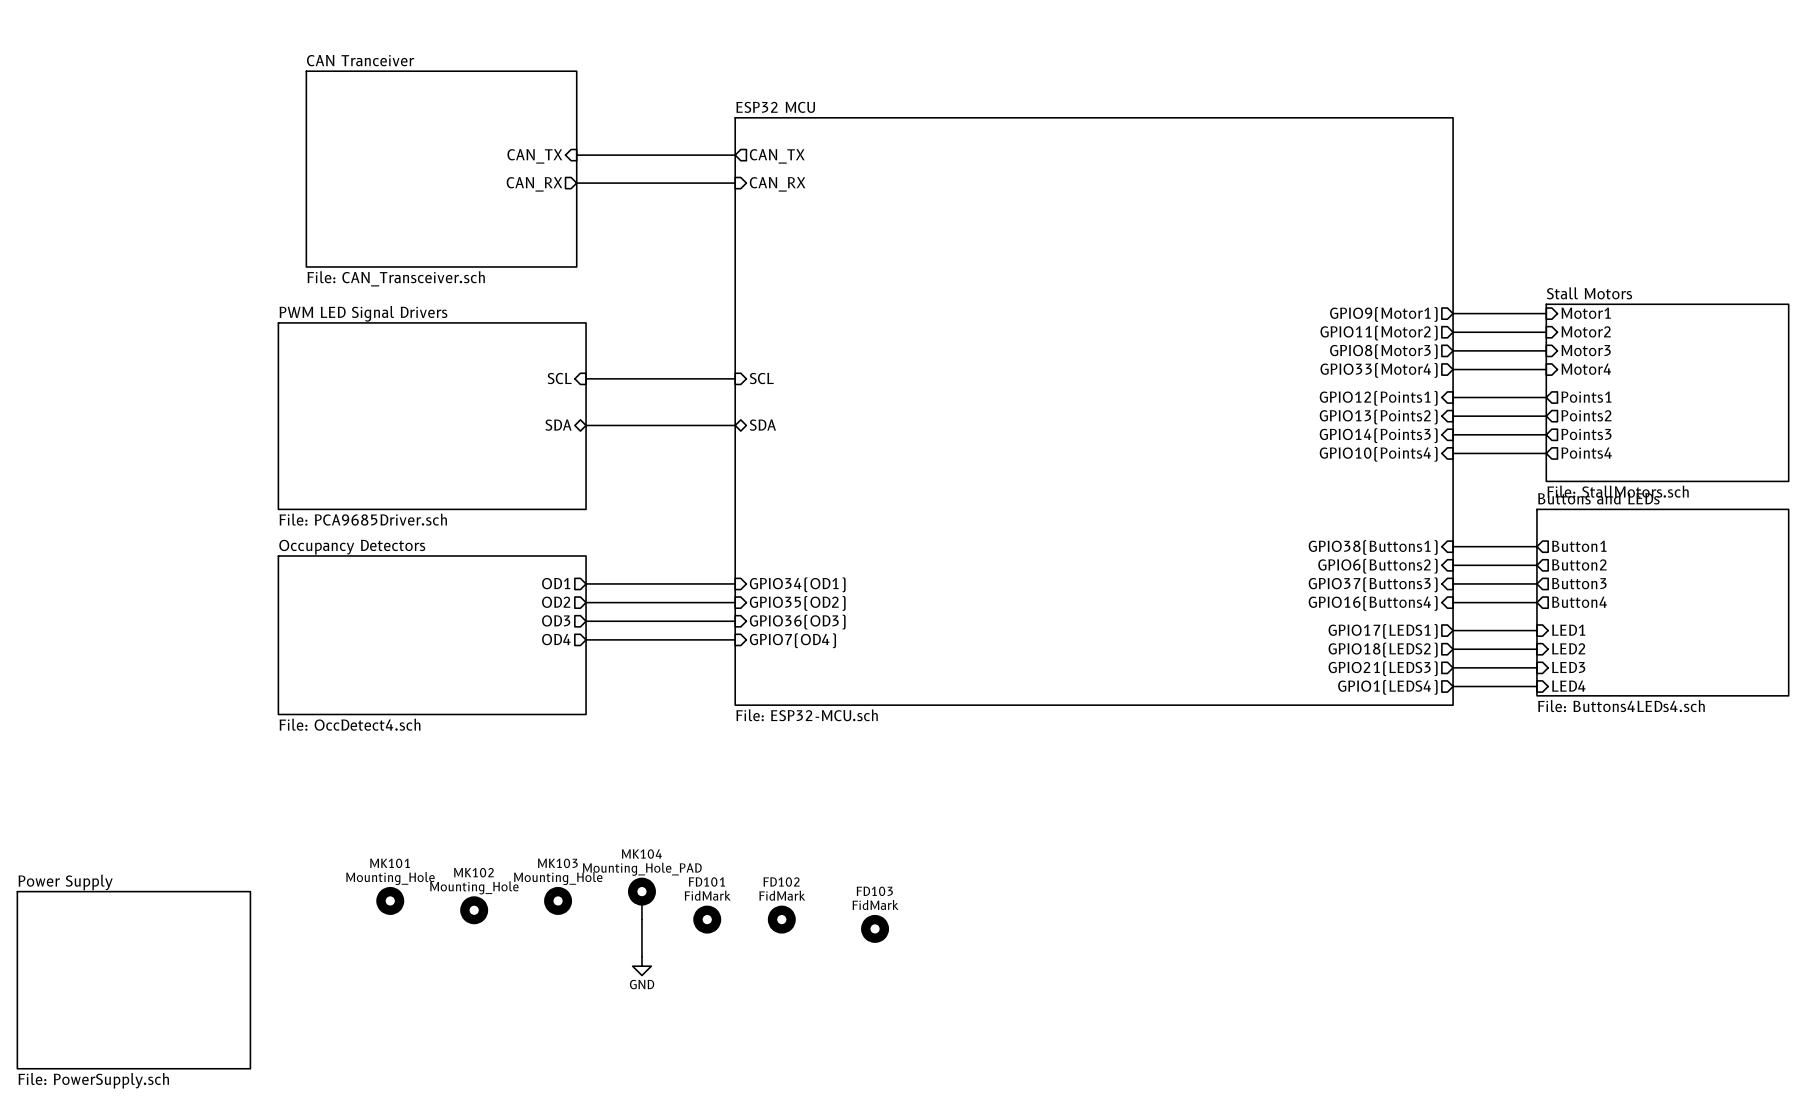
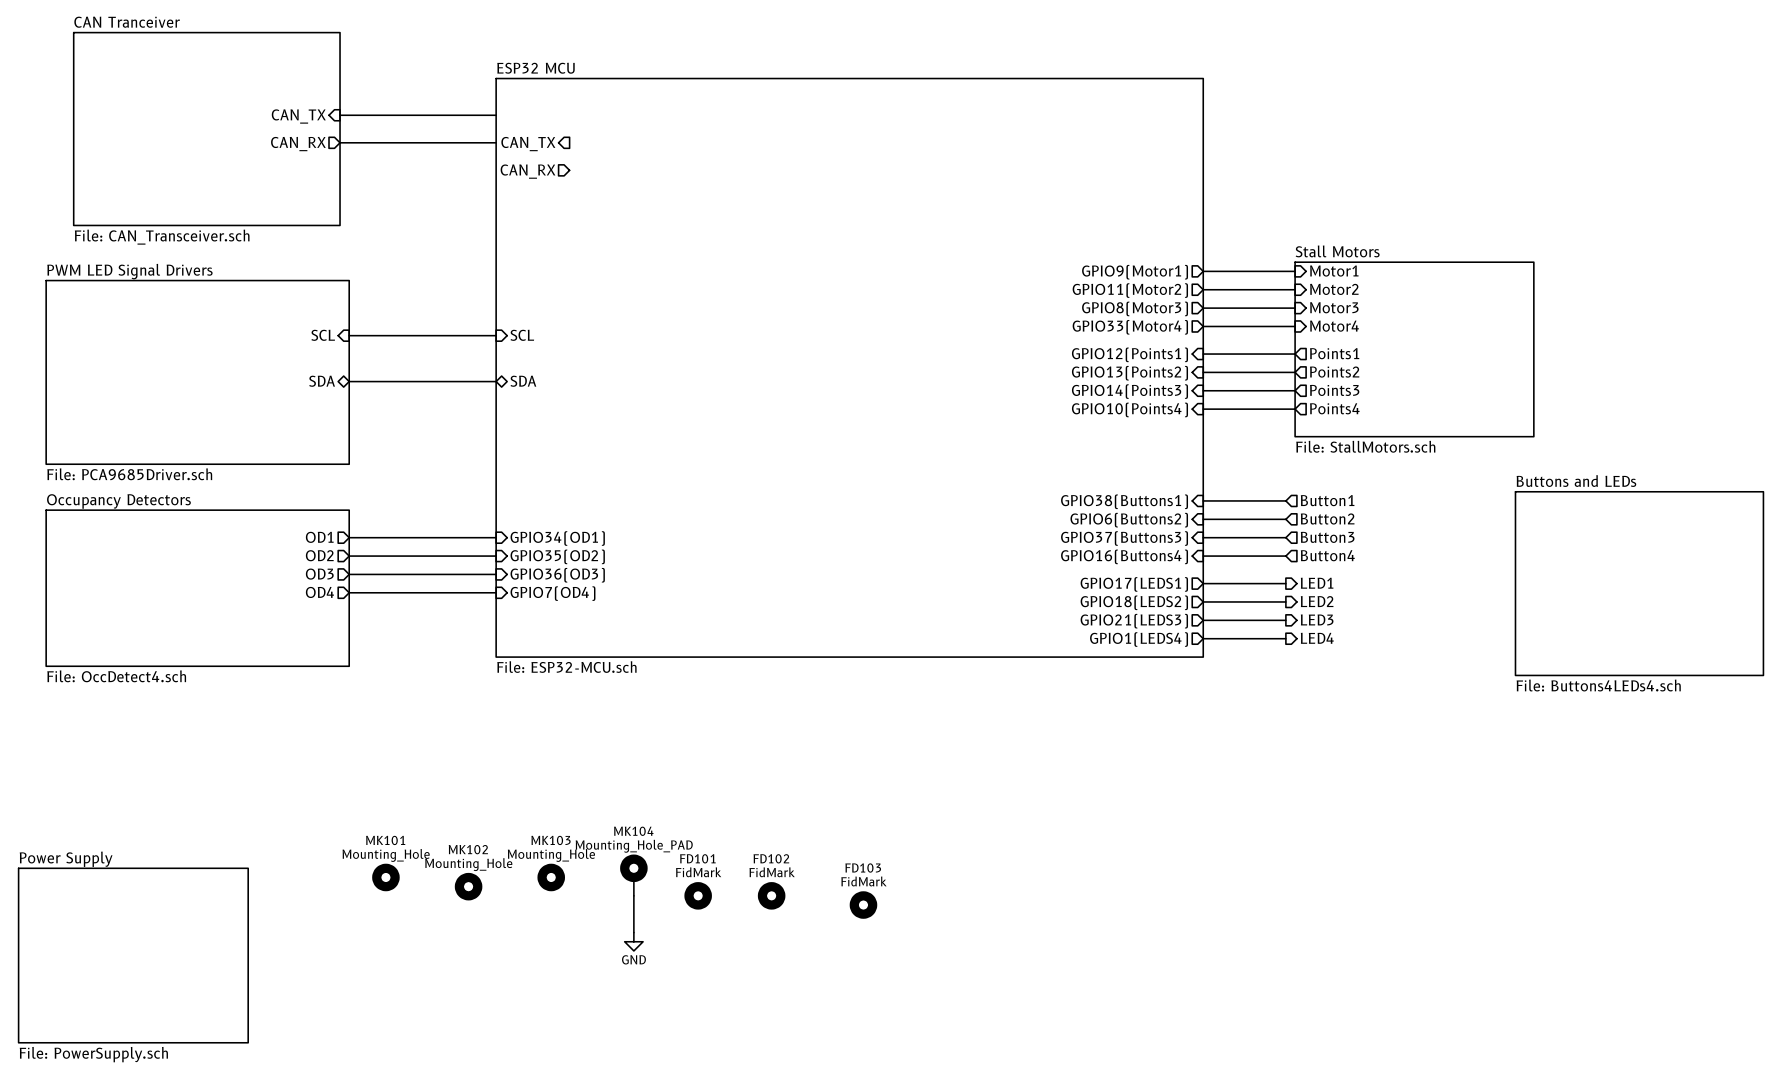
wire: none -> (340, 115) (496, 115)
sheet pin: none -> CAN_TX (298, 116)
sheet CAN Tranceiver: none -> File: CAN_Transceiver.sch (206, 129)
wire: none -> (340, 142) (496, 142)
wire: (576, 155) (735, 155) -> none
sheet pin: none -> CAN_RX (298, 144)
sheet pin: CAN_TX (777, 156) -> none
sheet CAN Tranceiver: File: CAN_Transceiver.sch (441, 169) -> none
wire: (576, 183) (735, 183) -> none
sheet pin: CAN_RX (777, 184) -> none
wire: none -> (1203, 271) (1295, 271)
sheet pin: none -> Motor1 (1334, 271)
sheet pin: none -> GPIO9(Motor1) (1135, 272)
sheet pin: none -> Motor2 (1334, 289)
wire: none -> (1203, 289) (1295, 289)
sheet pin: none -> GPIO11(Motor2) (1130, 290)
wire: (1453, 313) (1546, 313) -> none
sheet pin: Motor1 (1586, 313) -> none
sheet pin: GPIO9(Motor1) (1383, 314) -> none
wire: none -> (1203, 308) (1295, 308)
sheet pin: none -> Motor3 (1334, 307)
sheet pin: none -> GPIO8(Motor3) (1135, 308)
sheet pin: Motor2 (1586, 331) -> none
wire: (1453, 332) (1546, 332) -> none
sheet pin: GPIO11(Motor2) (1379, 333) -> none
wire: none -> (1203, 326) (1295, 326)
sheet pin: none -> Motor4 (1334, 326)
sheet pin: none -> GPIO33(Motor4) (1130, 327)
sheet pin: none -> SCL (323, 335)
wire: none -> (349, 335) (496, 335)
wire: (1453, 350) (1546, 350) -> none
sheet pin: Motor3 (1586, 350) -> none
sheet pin: GPIO8(Motor3) (1383, 351) -> none
sheet Stall Motors: none -> File: StallMotors.sch (1414, 349)
wire: none -> (1203, 354) (1295, 354)
sheet pin: none -> Points1 (1334, 353)
wire: (1453, 369) (1546, 369) -> none
sheet pin: Motor4 (1586, 369) -> none
sheet pin: none -> GPIO12(Points1) (1129, 354)
sheet pin: GPIO33(Motor4) (1379, 370) -> none
sheet pin rotation: 0° (559, 378) -> 180° (522, 335)
wire: (586, 378) (735, 378) -> none
sheet pin: SCL (761, 378) -> none
sheet pin: none -> Points2 (1334, 372)
sheet PWM LED Signal Drivers: none -> File: PCA9685Driver.sch (197, 372)
wire: none -> (1203, 372) (1295, 372)
sheet pin: none -> GPIO13(Points2) (1129, 373)
sheet Stall Motors: File: StallMotors.sch (1667, 392) -> none
sheet pin: none -> SDA (322, 381)
wire: none -> (349, 381) (496, 381)
wire: (1453, 397) (1546, 397) -> none
sheet pin: Points1 (1586, 397) -> none
sheet pin: GPIO12(Points1) (1378, 398) -> none
wire: none -> (1203, 390) (1295, 390)
sheet pin: none -> Points3 (1334, 390)
sheet pin: none -> GPIO14(Points3) (1129, 391)
sheet ESP32 MCU position: (1094, 411) -> (849, 367)
sheet pin: Points2 (1586, 415) -> none
sheet PWM LED Signal Drivers: File: PCA9685Driver.sch (432, 416) -> none
sheet pin: GPIO13(Points2) (1378, 416) -> none
wire: (1453, 416) (1546, 416) -> none
sheet pin rotation: 0° (558, 425) -> 180° (523, 381)
wire: (586, 425) (735, 425) -> none
sheet pin: SDA (762, 425) -> none
wire: none -> (1203, 409) (1295, 409)
sheet pin: none -> Points4 (1334, 408)
sheet pin: none -> GPIO10(Points4) (1129, 409)
wire: (1453, 434) (1546, 434) -> none
sheet pin: Points3 (1586, 434) -> none
sheet pin: GPIO14(Points3) (1378, 435) -> none
sheet pin: Points4 (1586, 453) -> none
sheet pin: GPIO10(Points4) (1378, 454) -> none
wire: none -> (1203, 500) (1285, 500)
sheet pin: none -> Button1 (1327, 500)
sheet pin: none -> GPIO38(Buttons1) (1124, 501)
wire: none -> (1203, 519) (1285, 519)
sheet pin: none -> Button2 (1327, 518)
sheet pin: none -> GPIO6(Buttons2) (1129, 520)
wire: (1453, 546) (1536, 546) -> none
sheet pin: Button1 (1579, 546) -> none
sheet pin: GPIO38(Buttons1) (1373, 547) -> none
sheet pin: none -> OD1 (319, 537)
wire: none -> (1203, 537) (1285, 537)
sheet pin: none -> Button3 (1327, 537)
sheet pin: none -> GPIO34(OD1) (557, 538)
sheet pin: none -> GPIO37(Buttons3) (1124, 538)
sheet pin: Button2 (1579, 564) -> none
wire: (1453, 565) (1536, 565) -> none
sheet pin: GPIO6(Buttons2) (1377, 566) -> none
sheet pin: none -> OD2 (319, 555)
wire: none -> (349, 556) (496, 556)
wire: none -> (1203, 556) (1285, 556)
sheet pin: none -> Button4 (1327, 555)
sheet pin: none -> GPIO35(OD2) (557, 556)
sheet pin: none -> GPIO16(Buttons4) (1124, 556)
sheet pin: OD1 (556, 583) -> none
wire: (586, 583) (735, 583) -> none
wire: (1453, 583) (1536, 583) -> none
sheet pin: Button3 (1579, 583) -> none
sheet pin: GPIO34(OD1) (797, 584) -> none
sheet pin: GPIO37(Buttons3) (1373, 584) -> none
sheet pin: none -> OD3 (319, 574)
wire: none -> (349, 574) (496, 574)
sheet pin: none -> GPIO36(OD3) (557, 575)
sheet pin: OD2 (556, 602) -> none
wire: (586, 602) (735, 602) -> none
wire: none -> (1203, 583) (1285, 583)
sheet pin: none -> LED1 (1317, 583)
wire: (1453, 602) (1536, 602) -> none
sheet pin: Button4 (1579, 602) -> none
sheet pin: GPIO35(OD2) (797, 603) -> none
sheet pin: none -> GPIO17(LEDS1) (1134, 584)
sheet pin: GPIO16(Buttons4) (1373, 603) -> none
sheet Occupancy Detectors: none -> File: OccDetect4.sch (197, 588)
sheet pin: none -> OD4 (319, 592)
wire: none -> (349, 592) (496, 592)
sheet pin: none -> GPIO7(OD4) (553, 593)
sheet pin: OD3 (556, 620) -> none
sheet pin: none -> LED2 (1317, 601)
wire: (586, 621) (735, 621) -> none
wire: none -> (1203, 601) (1285, 601)
sheet pin: GPIO36(OD3) (797, 622) -> none
sheet pin: none -> GPIO18(LEDS2) (1134, 602)
wire: (1453, 630) (1536, 630) -> none
sheet pin: LED1 (1568, 630) -> none
sheet pin: GPIO17(LEDS1) (1383, 631) -> none
sheet Occupancy Detectors: File: OccDetect4.sch (432, 635) -> none
sheet pin: OD4 (556, 639) -> none
wire: (586, 639) (735, 639) -> none
wire: none -> (1203, 620) (1285, 620)
sheet pin: none -> LED3 (1317, 619)
sheet pin: GPIO7(OD4) (792, 640) -> none
sheet pin: none -> GPIO21(LEDS3) (1134, 621)
sheet pin: LED2 (1568, 648) -> none
wire: (1453, 649) (1536, 649) -> none
sheet pin: GPIO18(LEDS2) (1383, 650) -> none
wire: none -> (1203, 638) (1285, 638)
sheet pin: none -> LED4 (1317, 638)
sheet pin: none -> GPIO1(LEDS4) (1139, 639)
wire: (1453, 667) (1536, 667) -> none
sheet pin: LED3 (1568, 667) -> none
sheet pin: GPIO21(LEDS3) (1383, 668) -> none
wire: (1453, 686) (1536, 686) -> none
sheet pin: LED4 (1568, 686) -> none
sheet pin: GPIO1(LEDS4) (1387, 687) -> none

